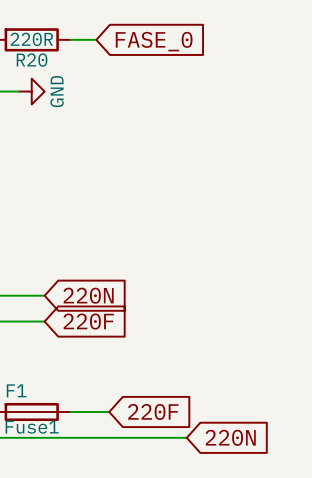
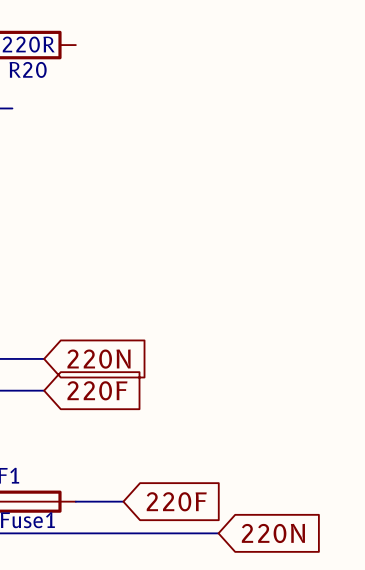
wire: (70, 39) (96, 39) -> none
global label: FASE_0 (154, 41) -> none
power symbol: GND (31, 91) -> none

